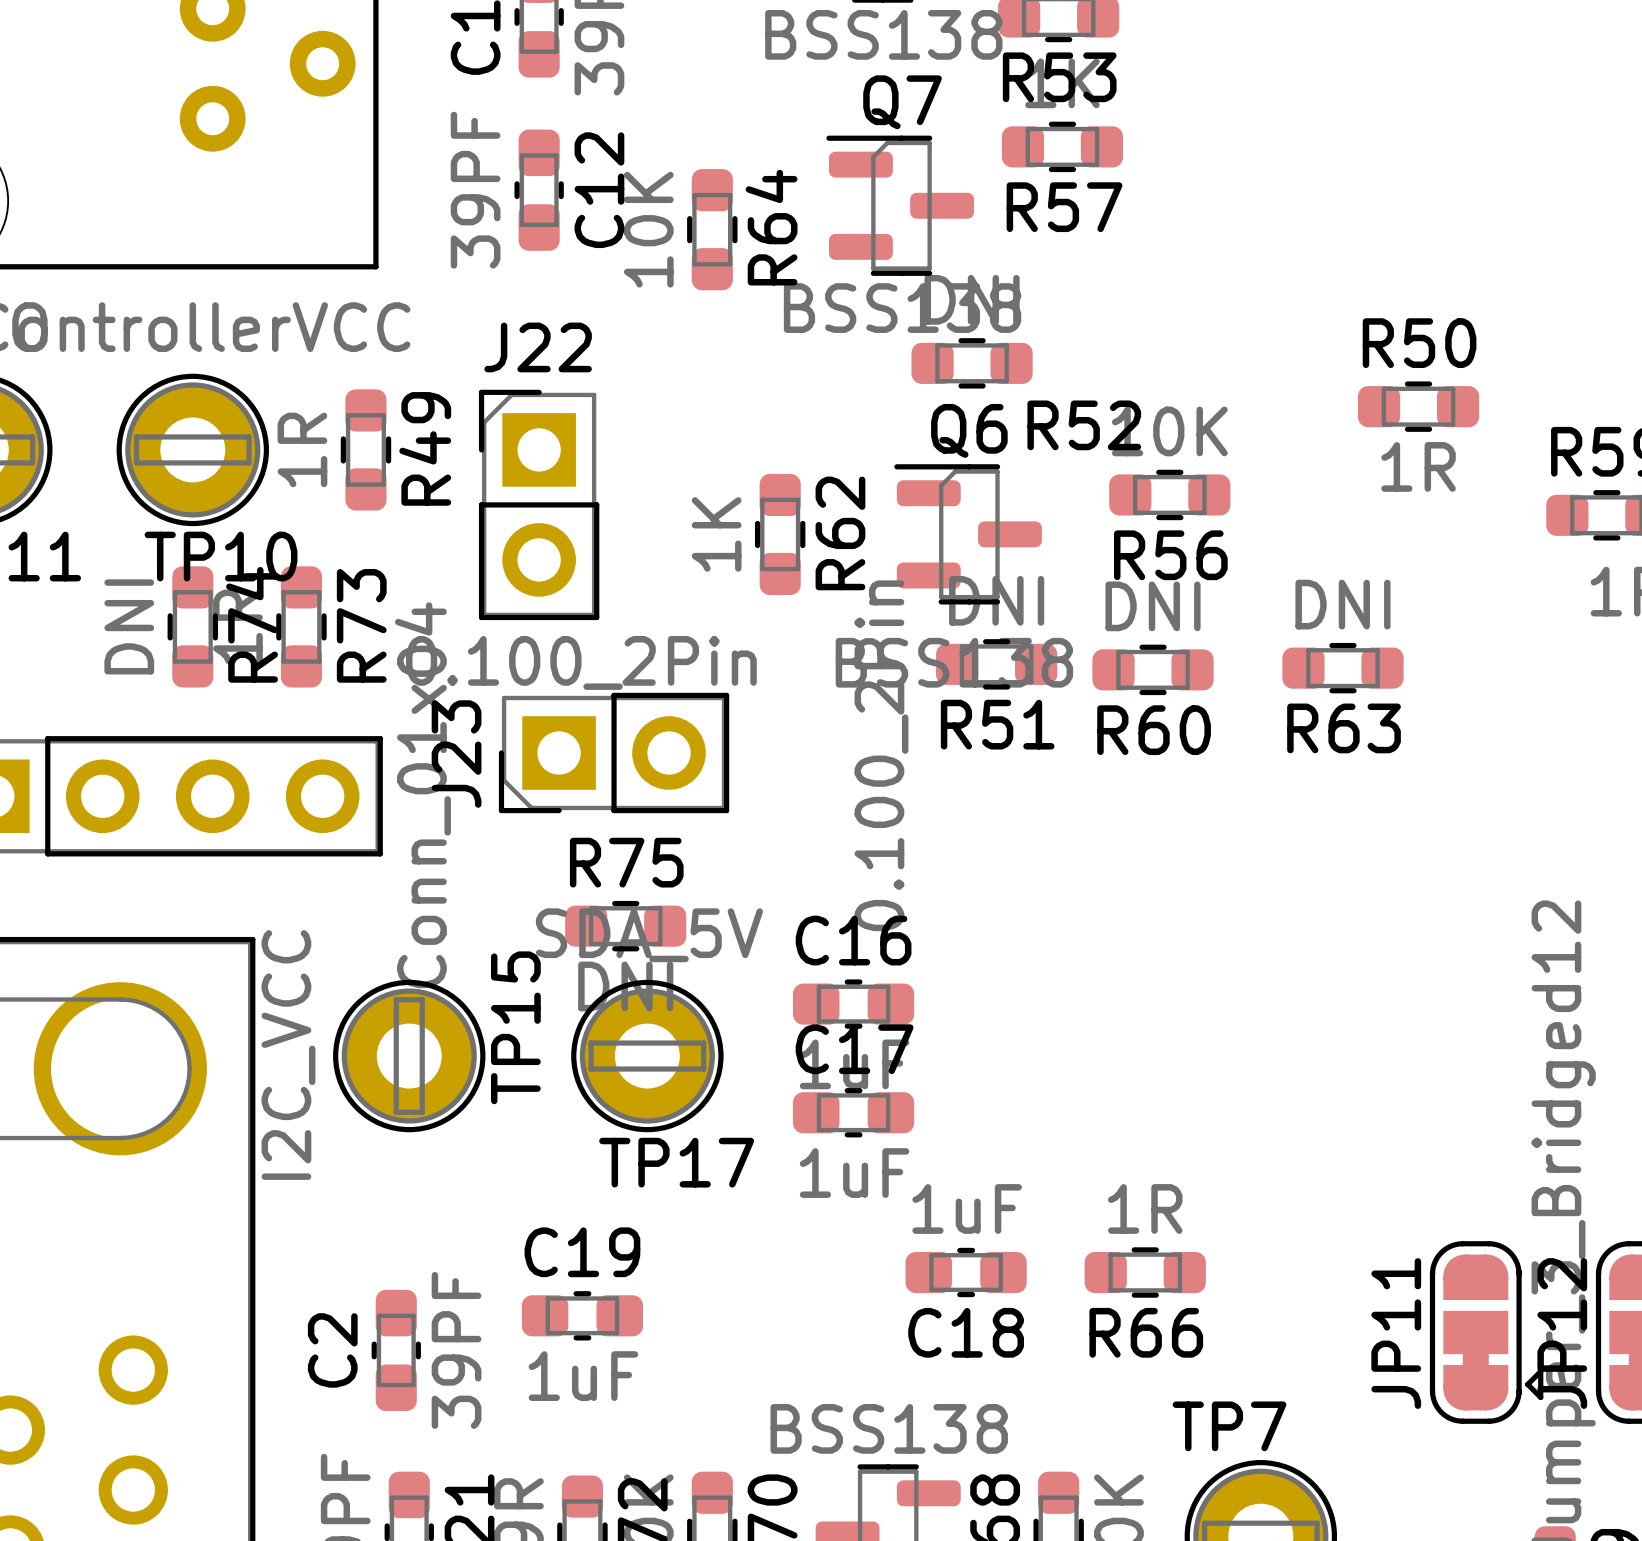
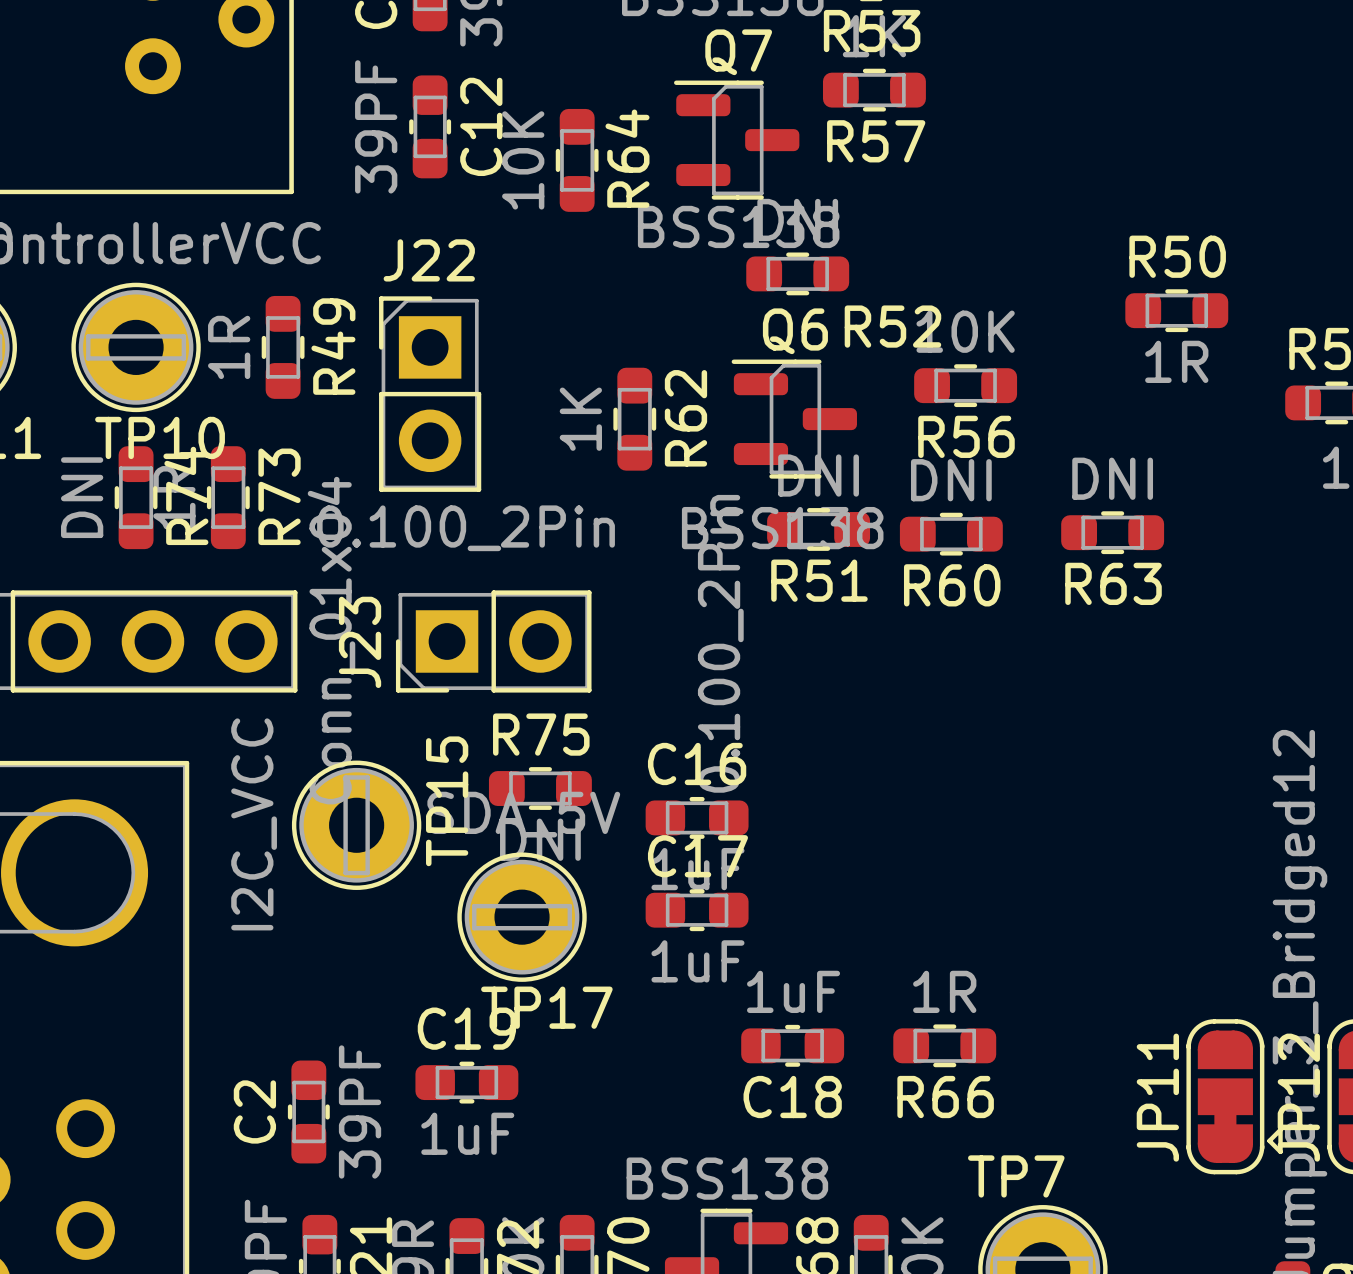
J23 position: (614, 752) -> (493, 641)
R75 position: (625, 926) -> (540, 788)
TP15 position: (409, 1056) -> (356, 825)
TP17 position: (647, 1056) -> (522, 917)

